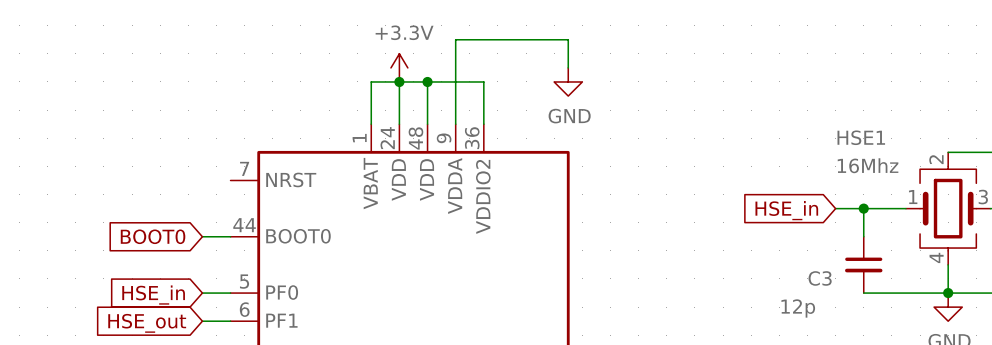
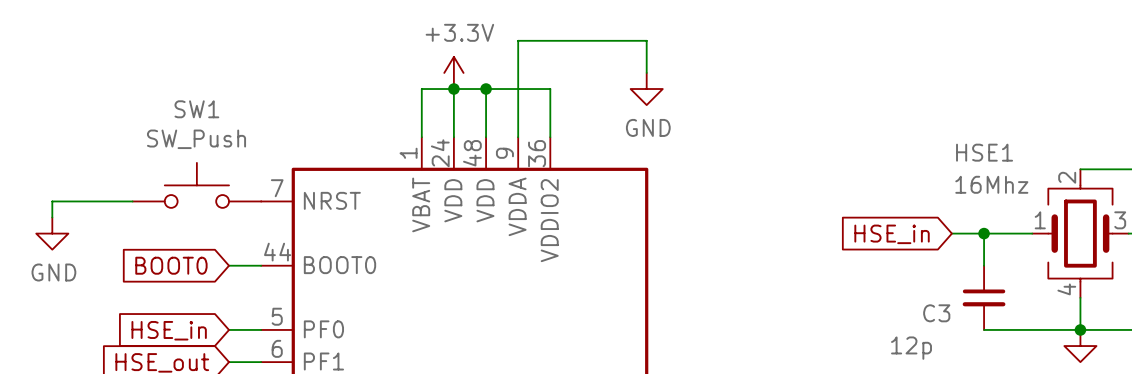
SW1: none -> SW_Push (196, 185)
wire: none -> (132, 201) (52, 201) (52, 217)
power symbol: none -> GND (52, 233)

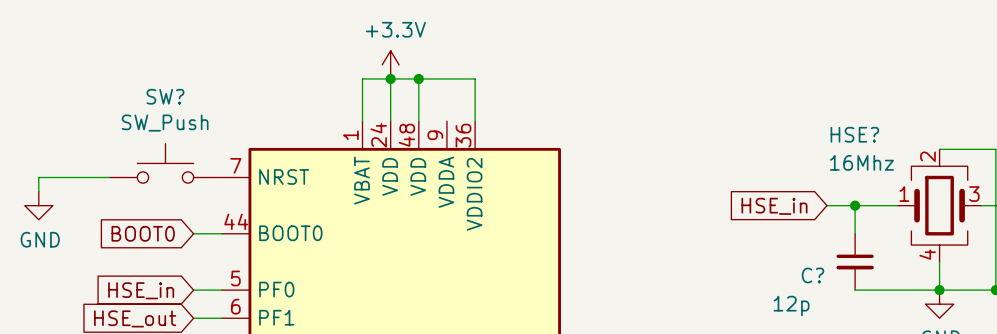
wire: (646, 72) (646, 40) (518, 40) (518, 137) -> none
power symbol: GND (646, 89) -> none
SW1 name: SW1 (196, 109) -> SW? (165, 96)
HSE1 name: HSE1 (984, 152) -> HSE? (854, 134)
C3 name: C3 (936, 313) -> C? (812, 275)

